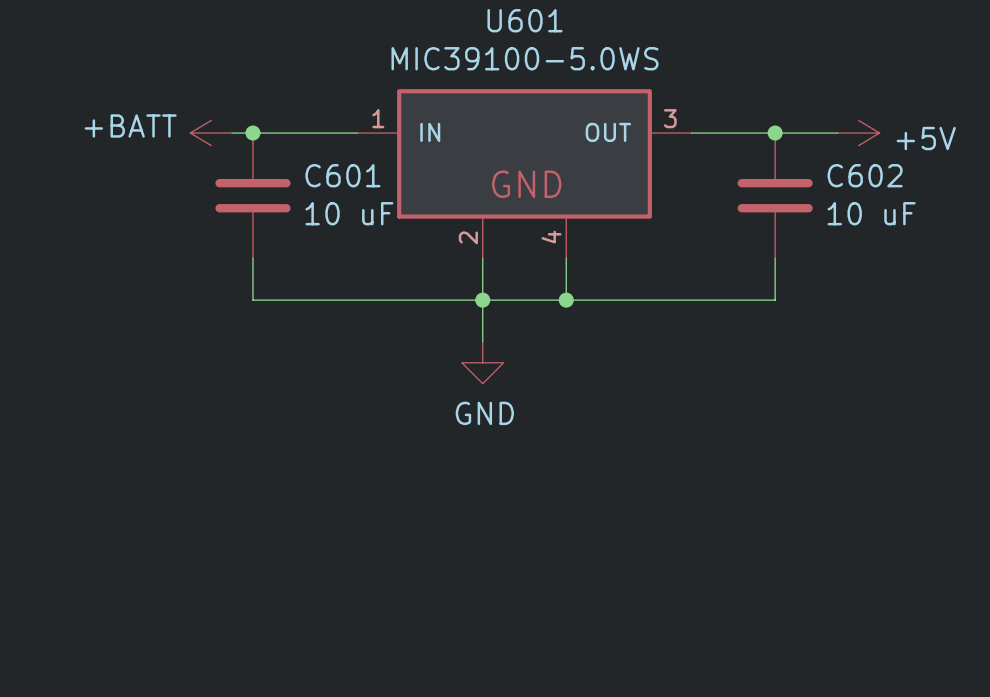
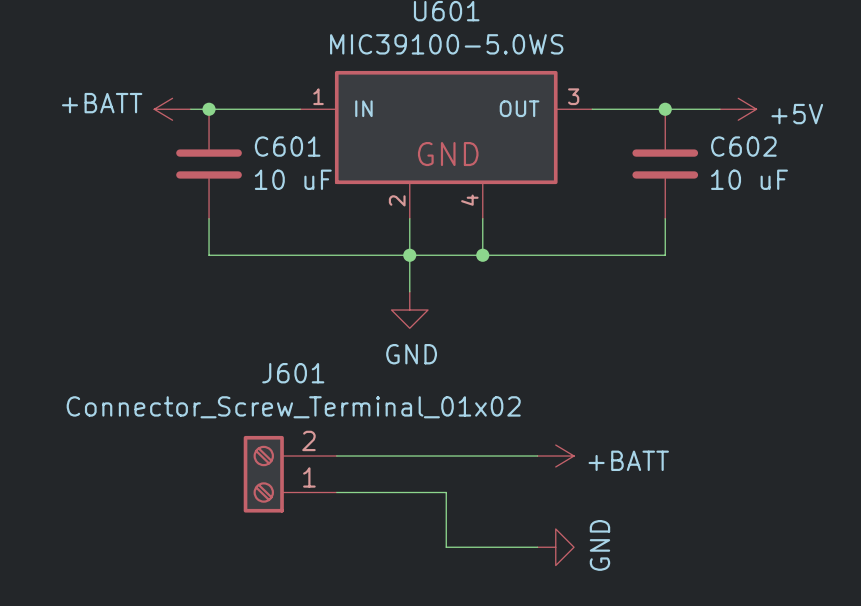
wire: none -> (336, 456) (537, 456)
power symbol: none -> +BATT (555, 456)
J601: none -> Connector_Screw_Terminal_01x02 (290, 474)
wire: none -> (336, 492) (446, 492) (446, 547) (537, 547)
power symbol: none -> GND (555, 547)

